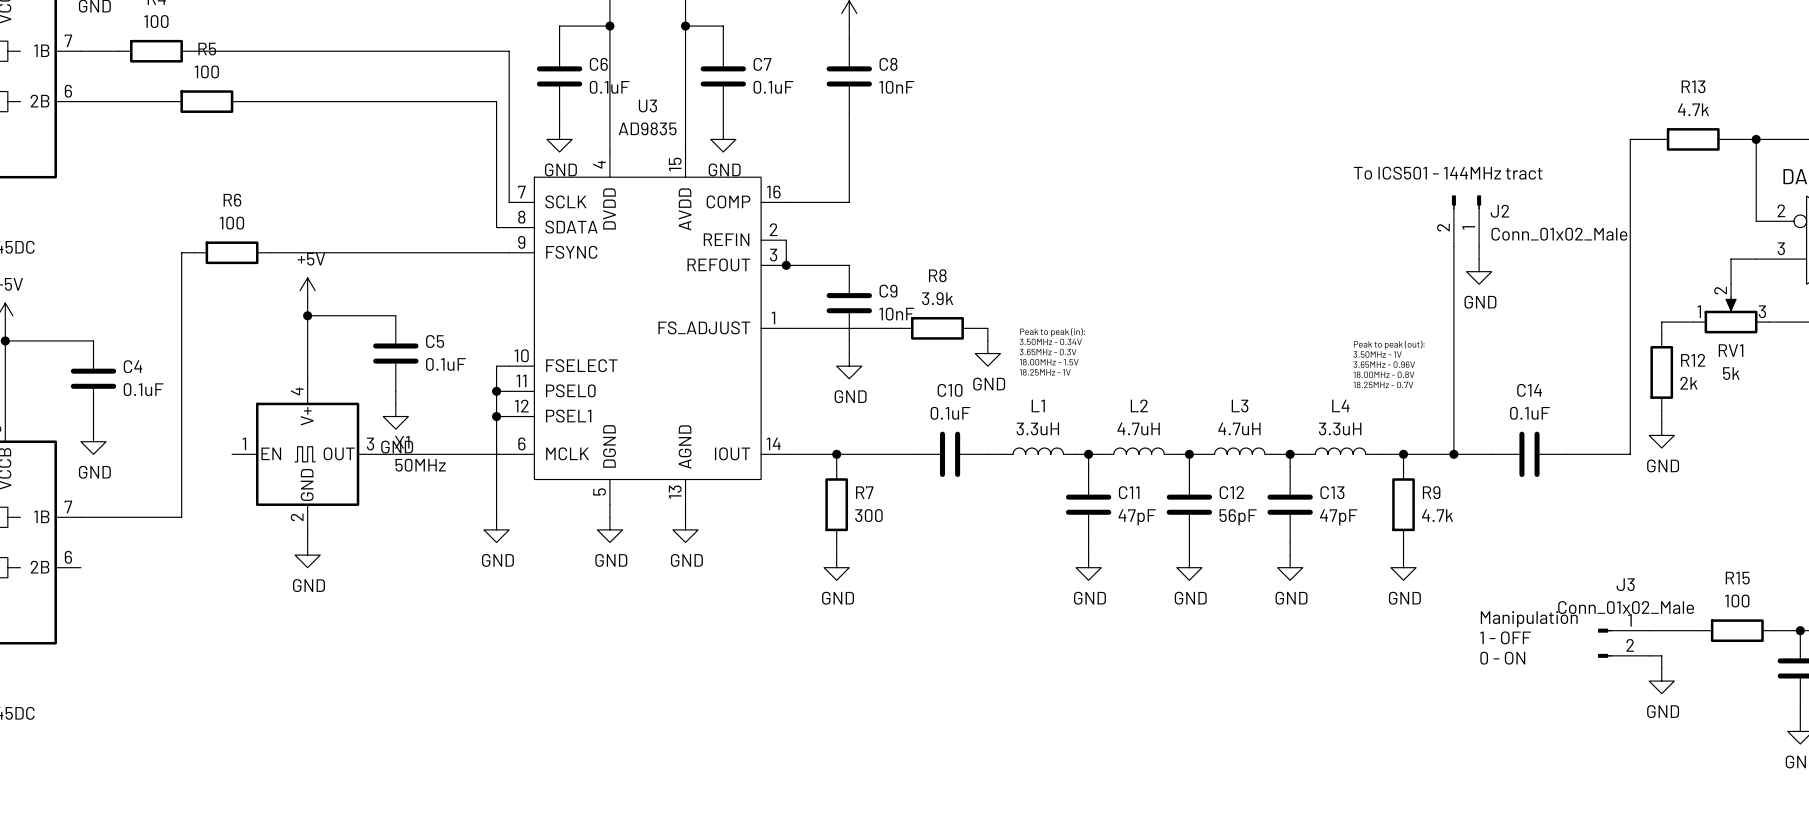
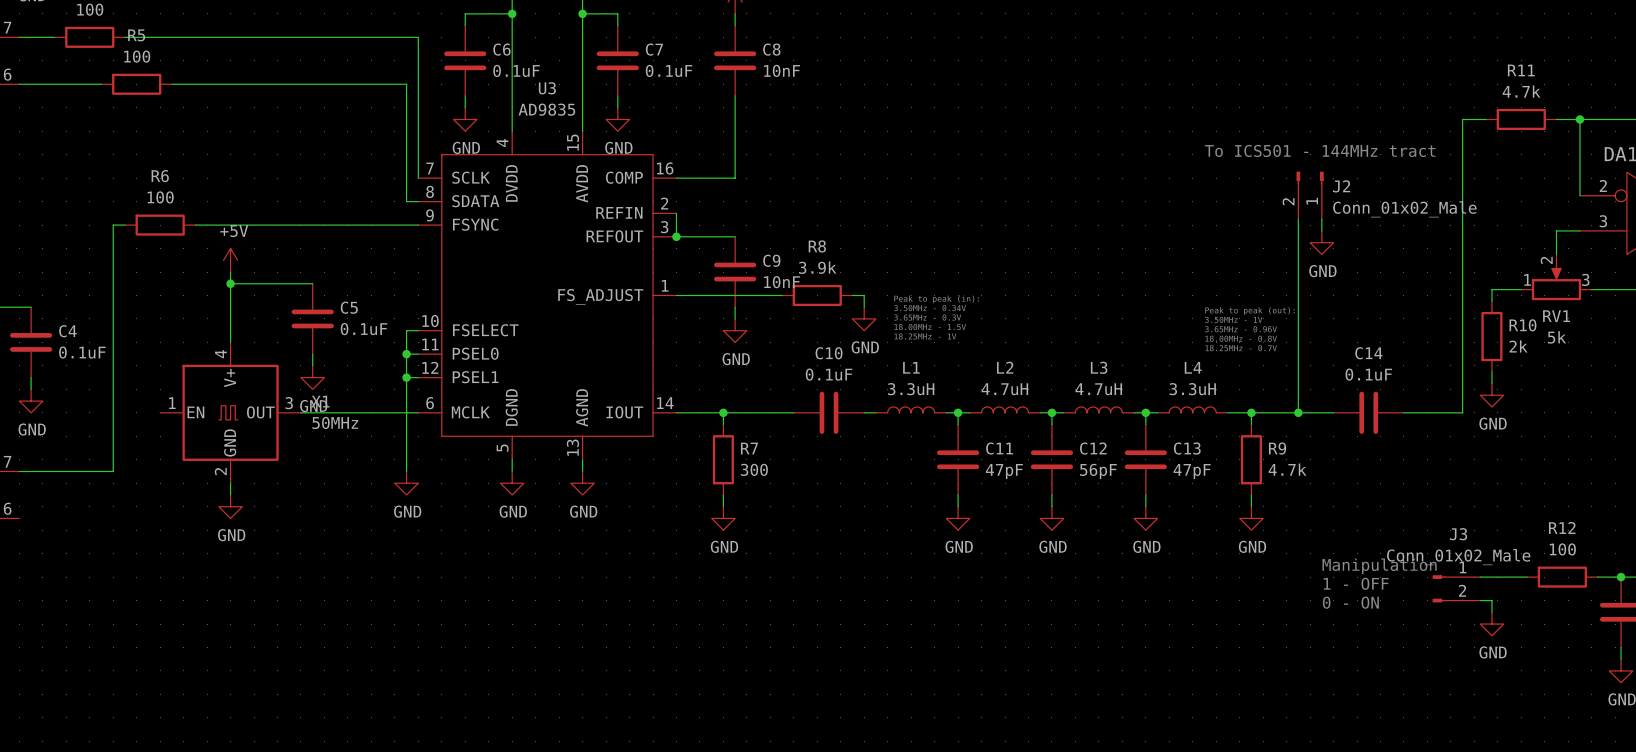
R13 name: R13 (1693, 86) -> R11 (1521, 70)
R12 name: R12 (1693, 360) -> R10 (1522, 325)
R15 name: R15 (1737, 578) -> R12 (1562, 527)

